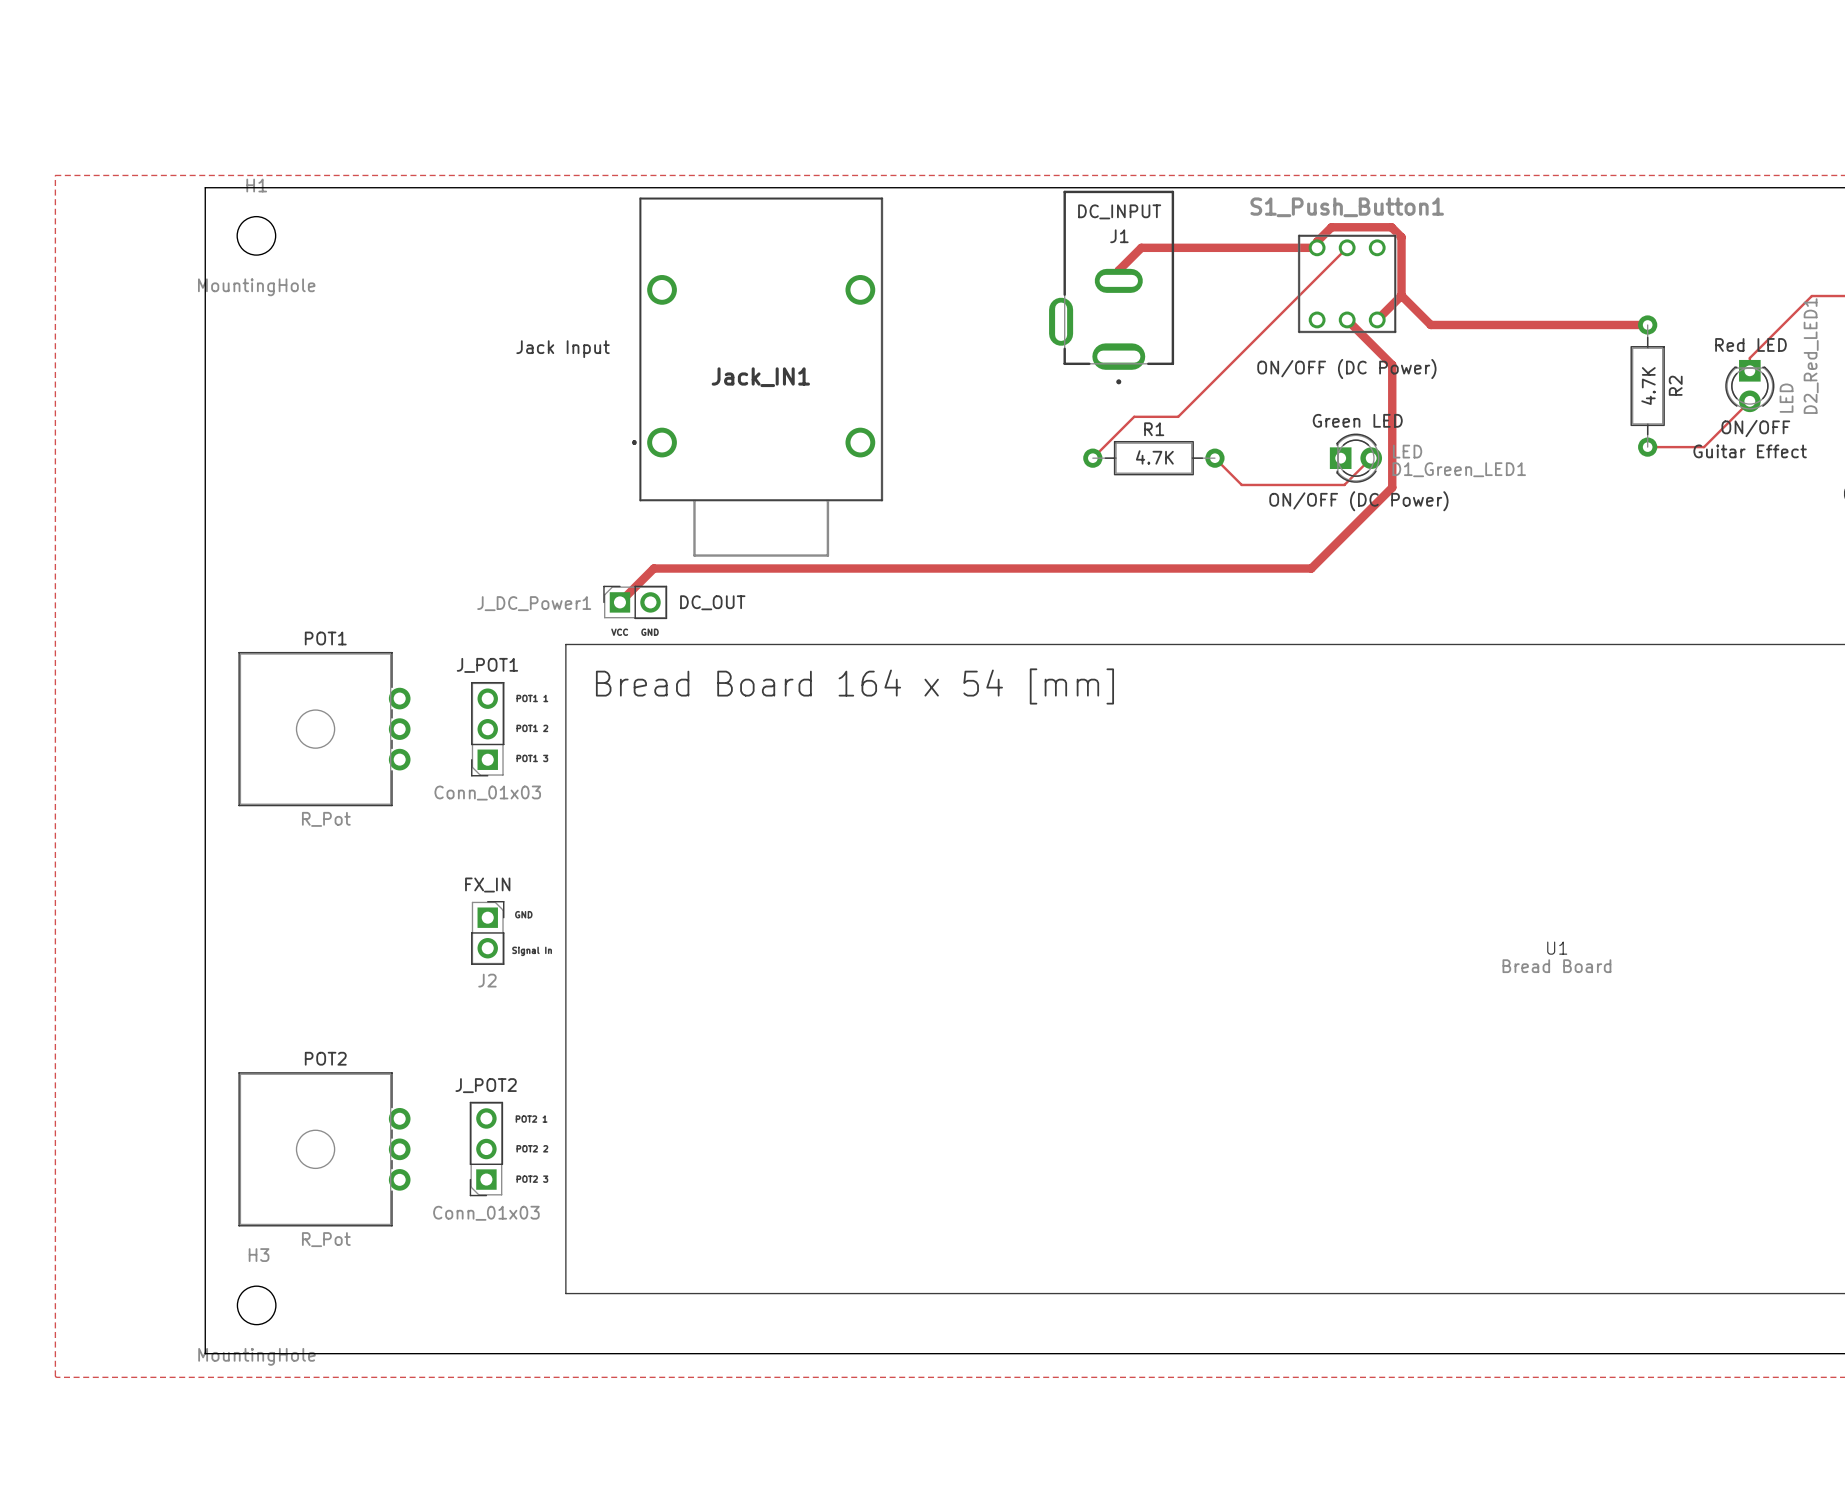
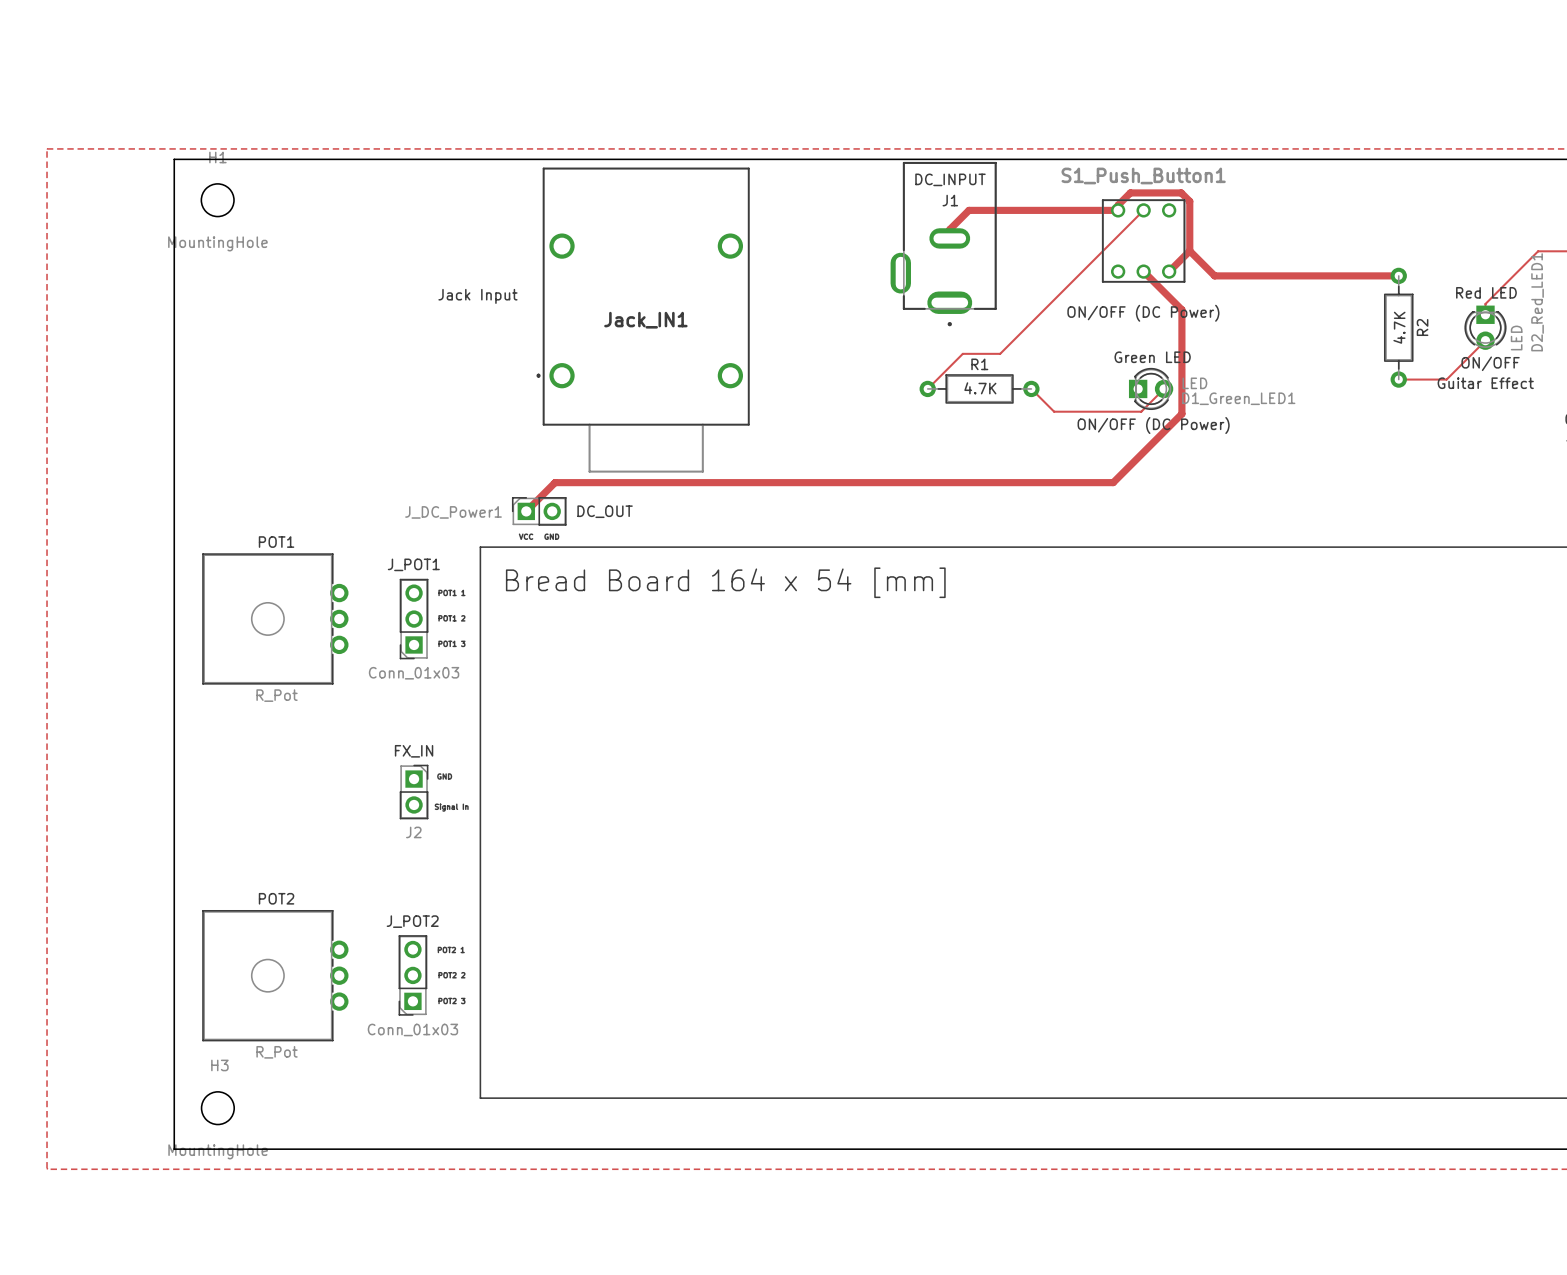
U1: Bread Board (1556, 957) -> none

